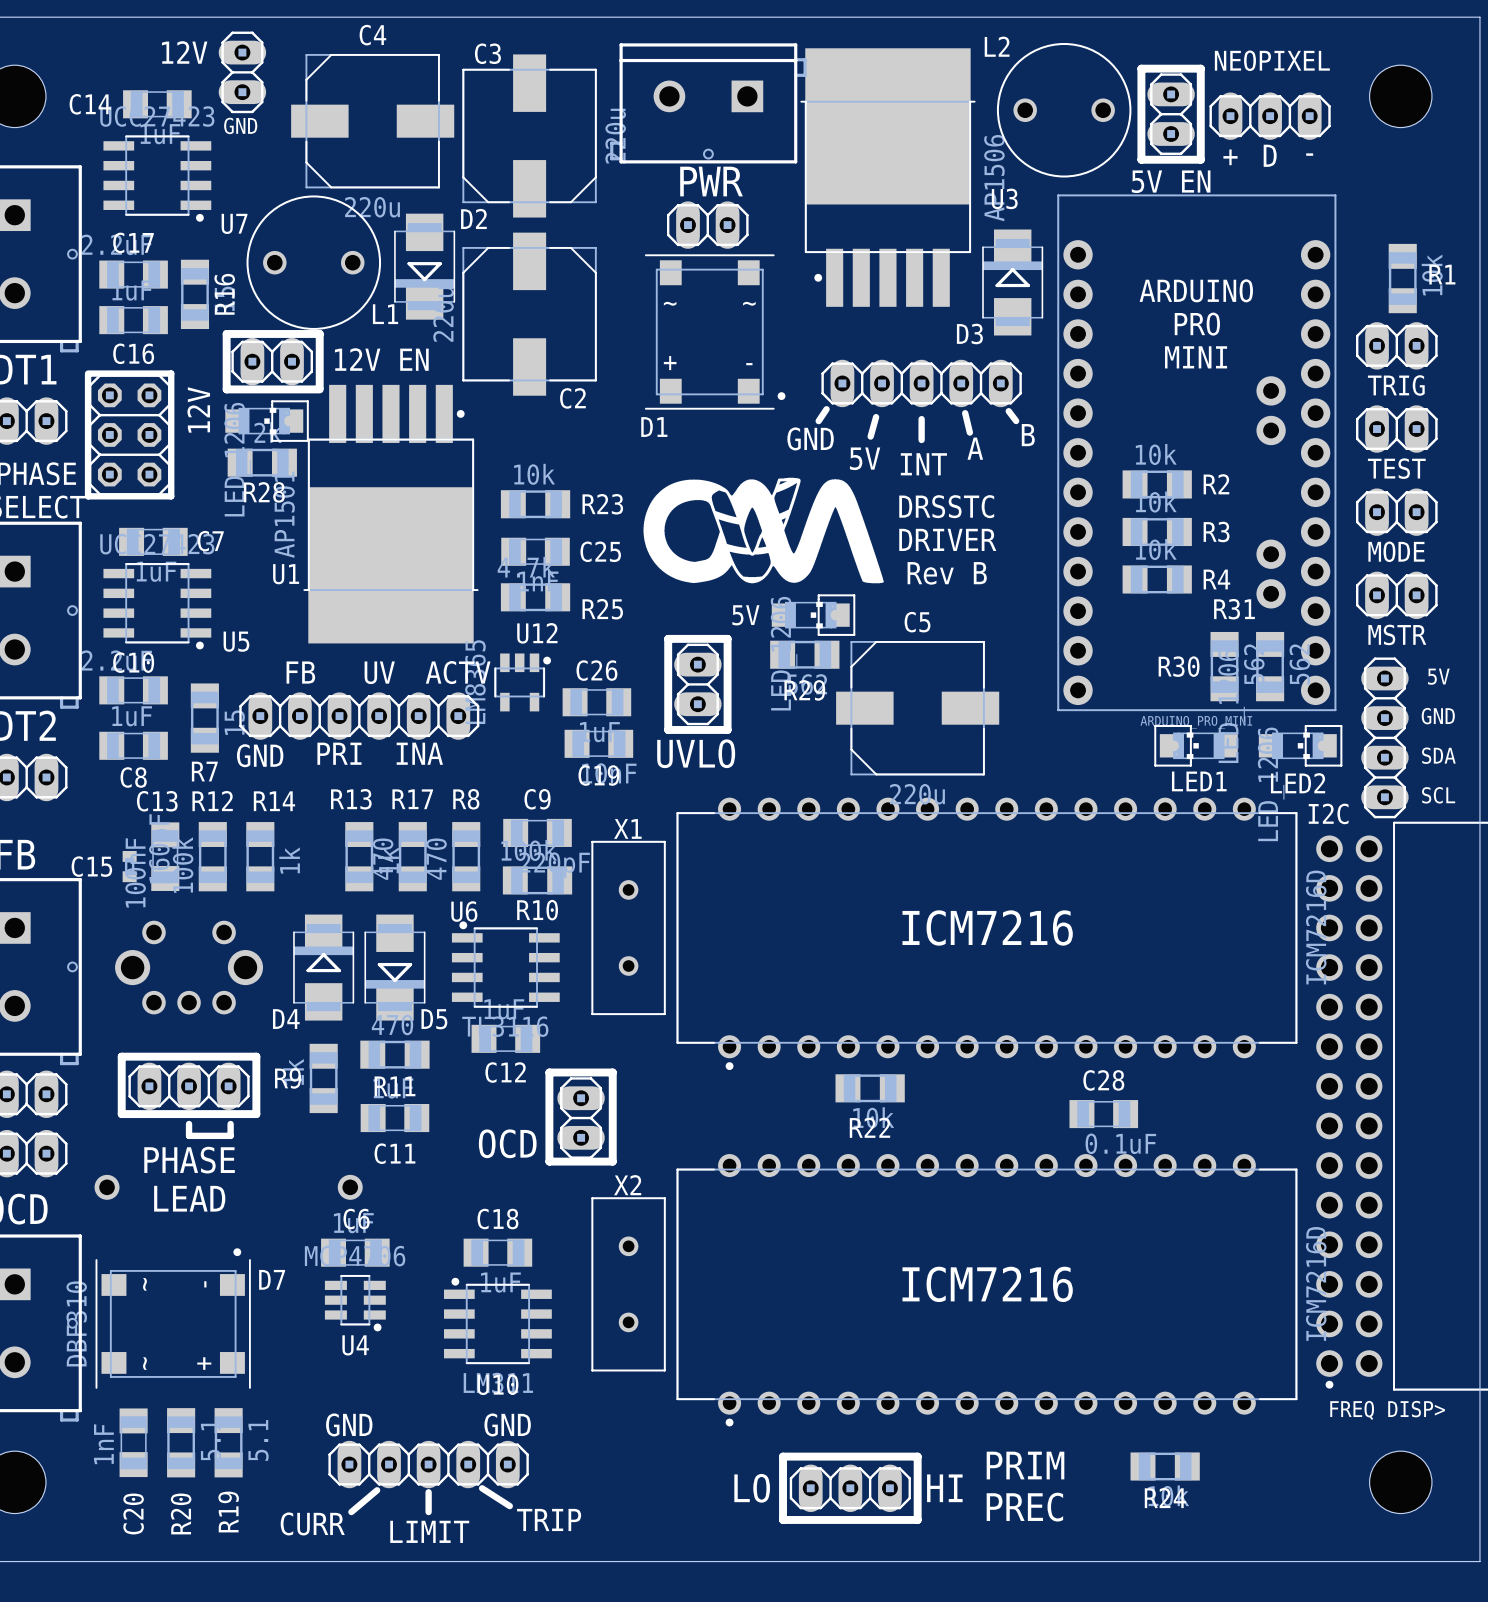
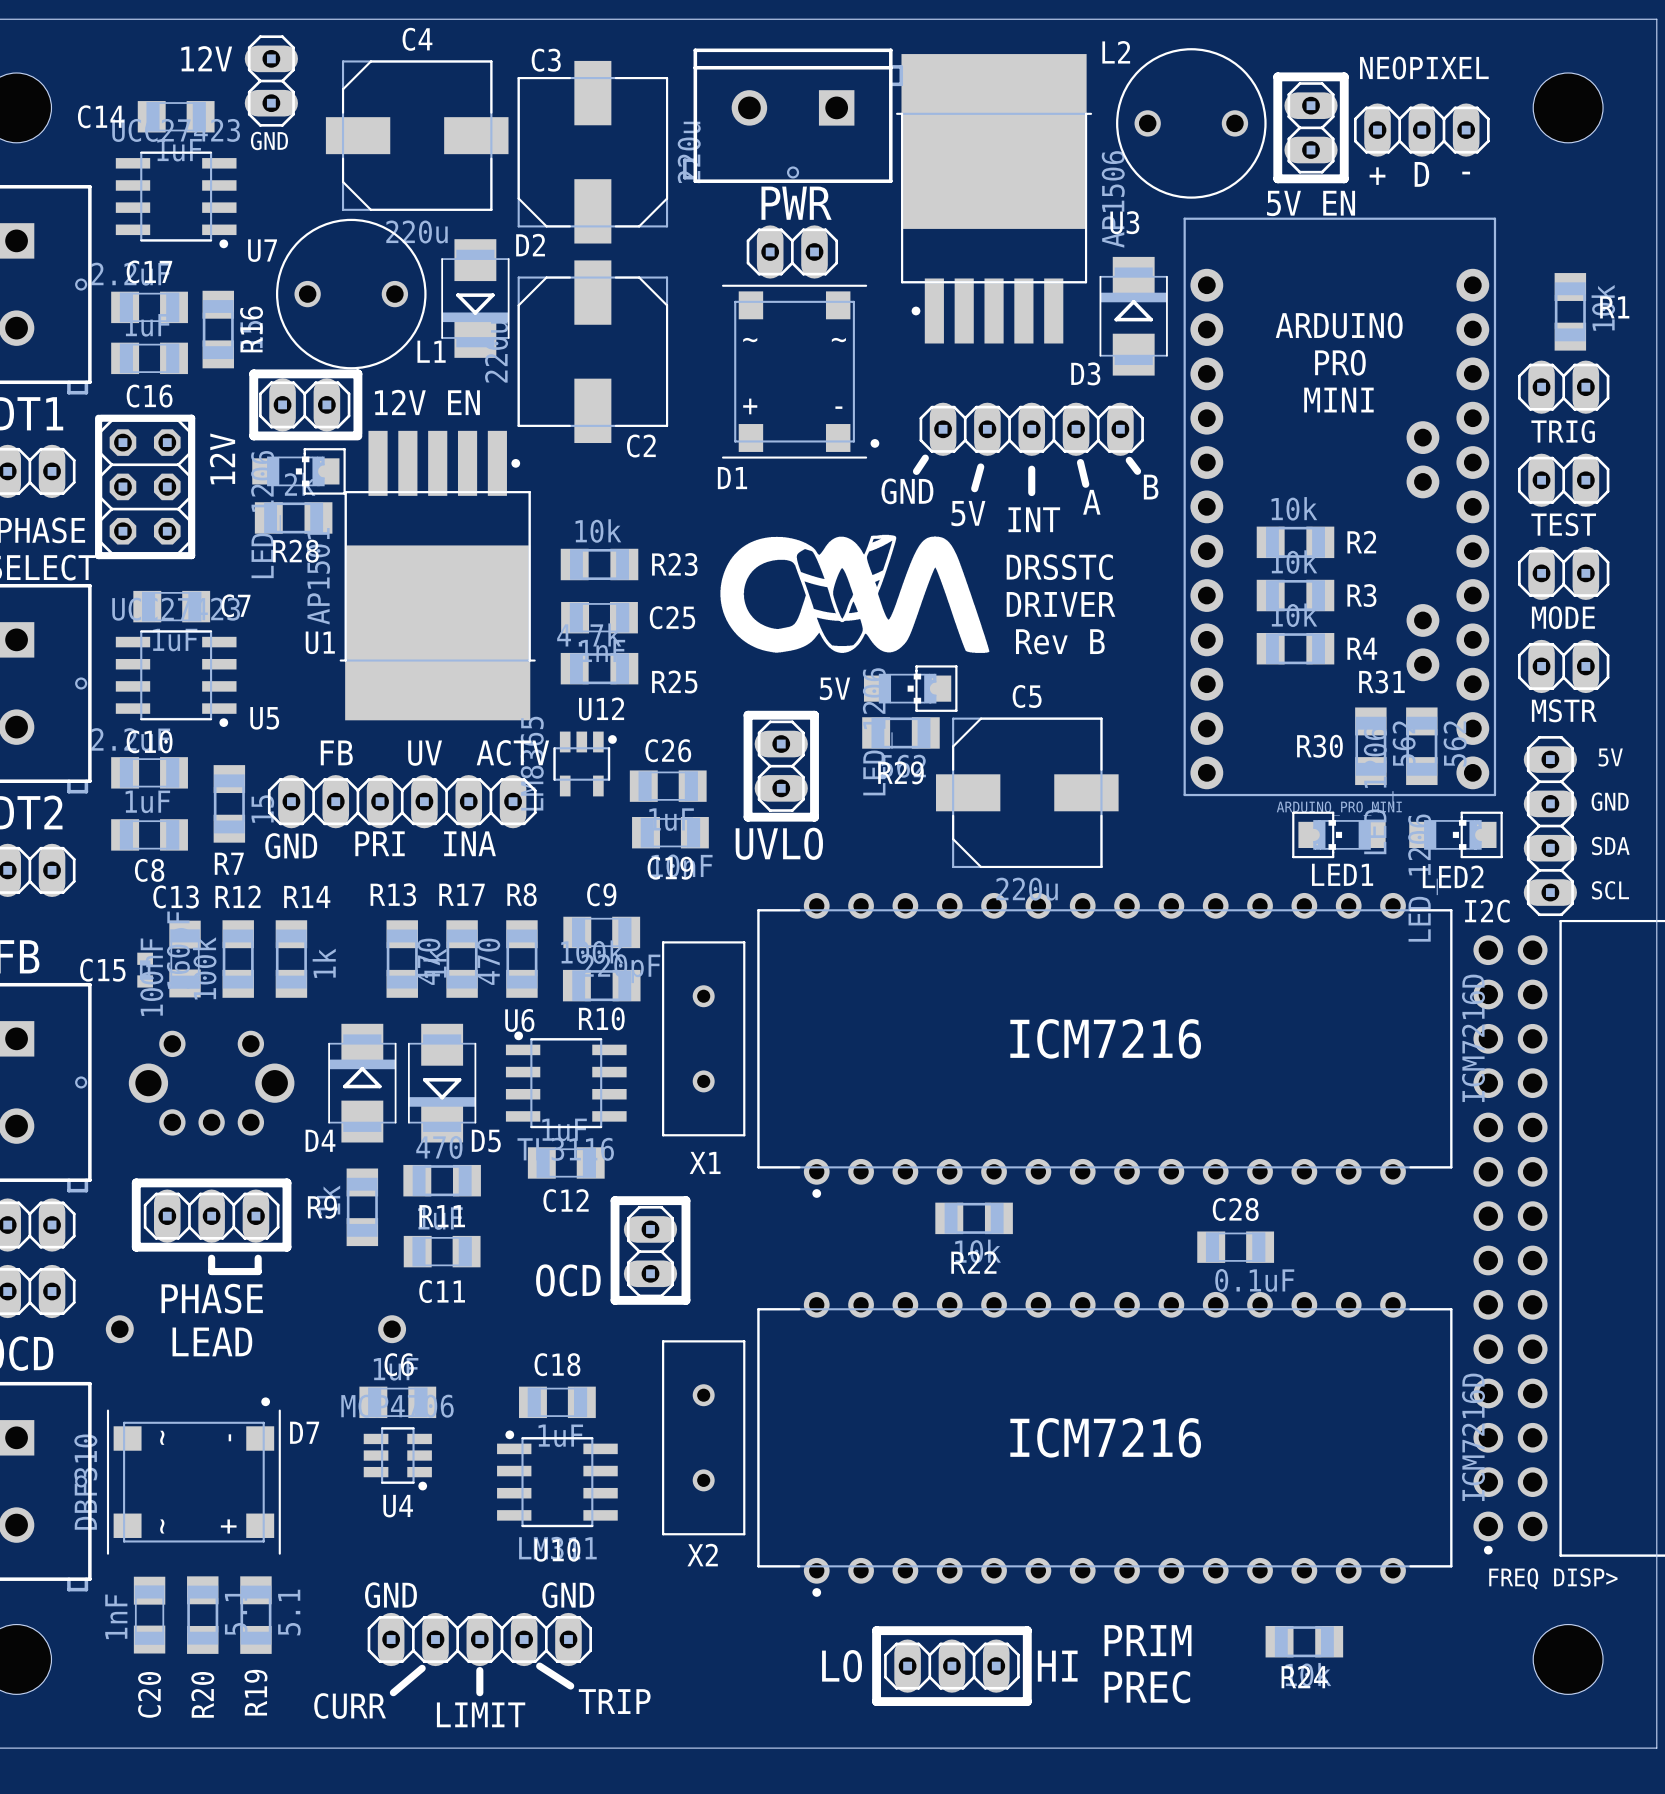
X1 name position: X1 (627, 828) -> X1 (705, 1162)
X2 name position: X2 (627, 1185) -> X2 (702, 1555)

